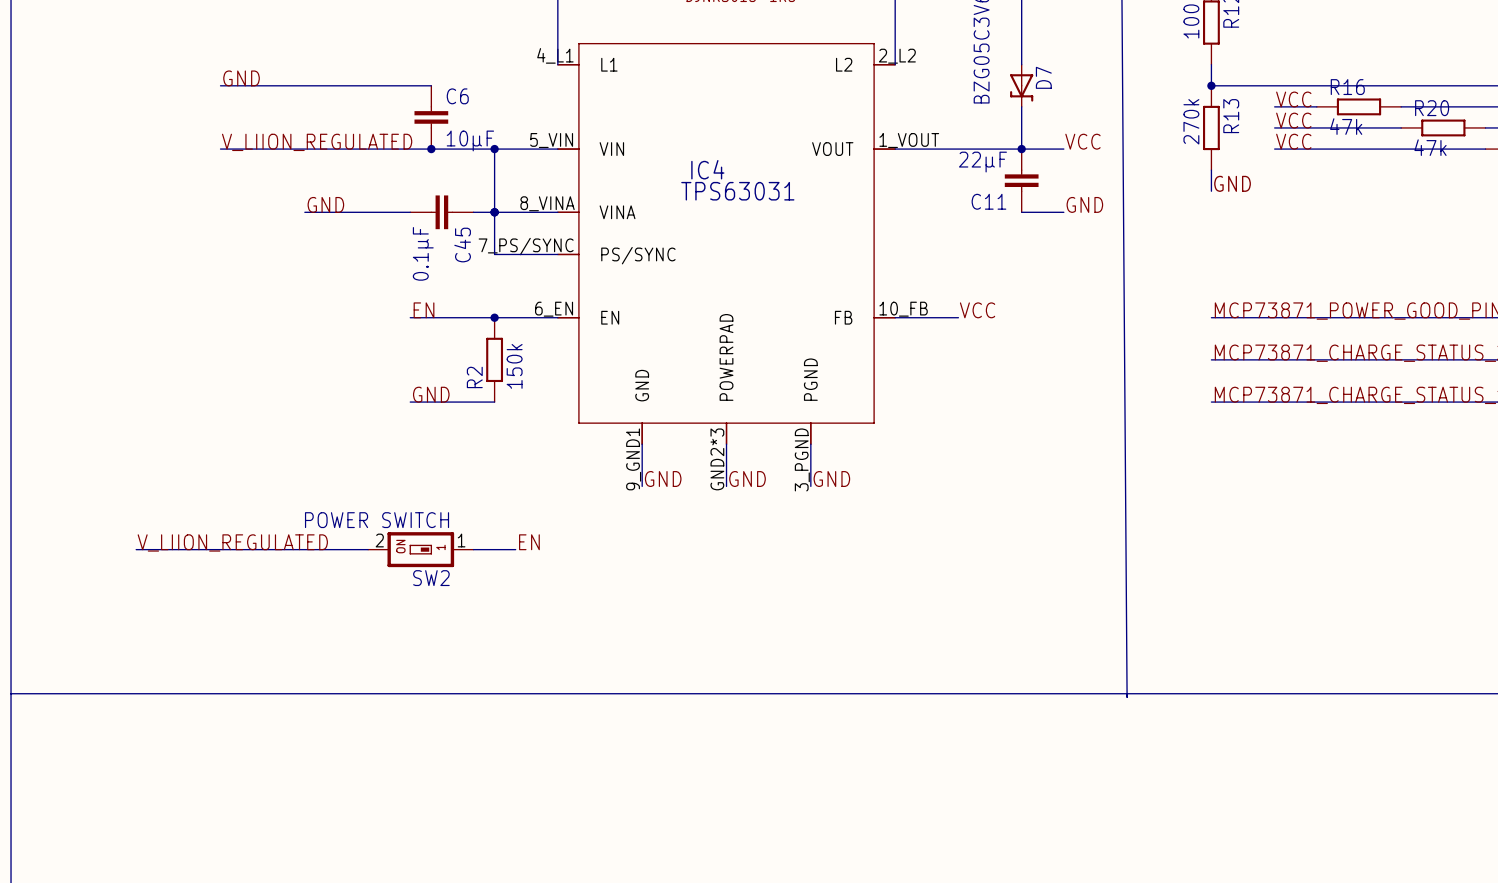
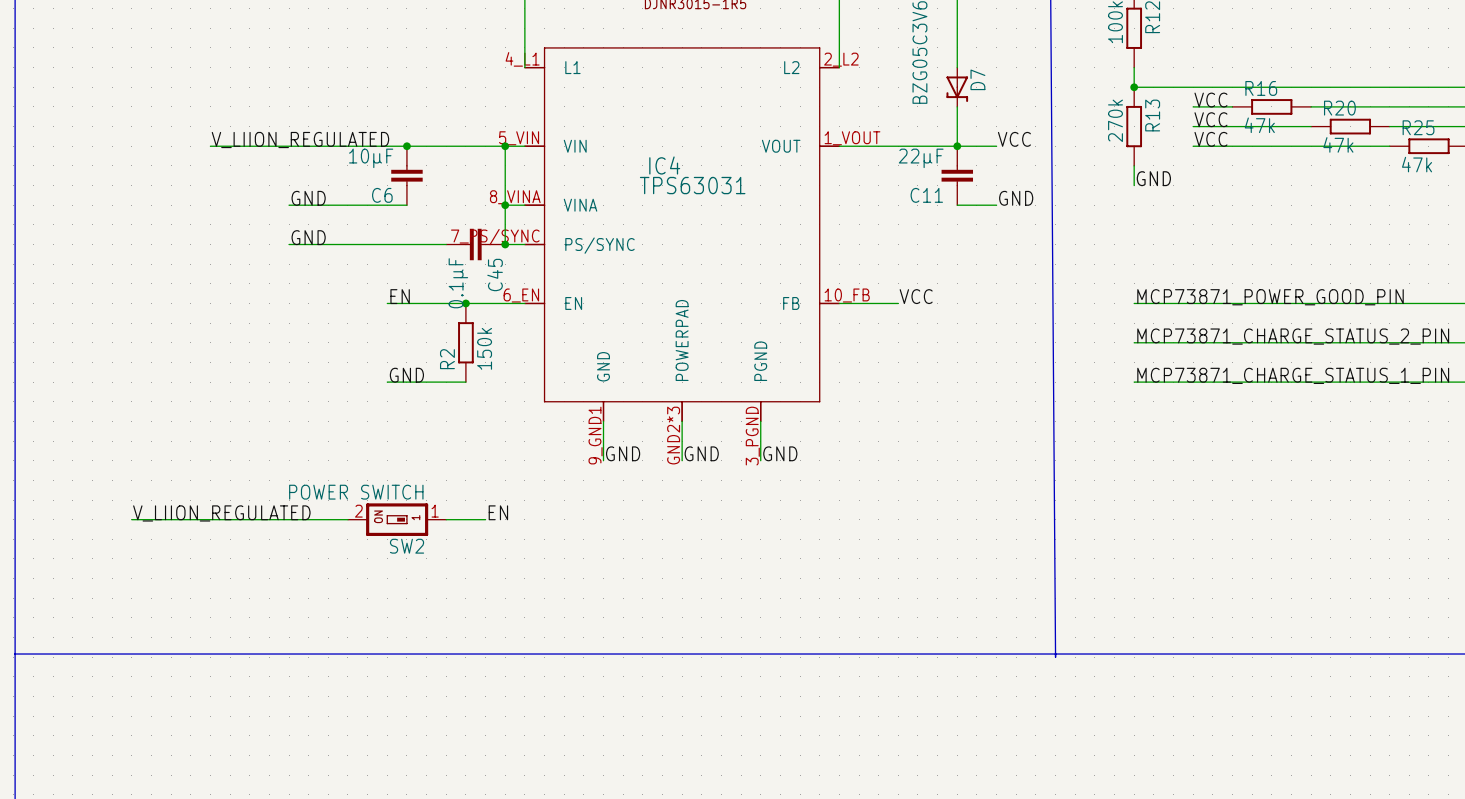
label position: GND (241, 78) -> GND (308, 237)
wire: (220, 85) (431, 85) -> none
C6 name position: C6 (457, 96) -> C6 (382, 195)
C6 position: (431, 117) -> (406, 175)
C6 value position: 10µF (470, 140) -> 10µF (371, 158)
wire: (494, 149) (494, 254) (536, 254) -> (505, 146) (505, 244)
junction: (494, 149) -> none
junction: none -> (505, 146)
C45 position: (441, 212) -> (475, 244)
wire: (473, 212) (536, 212) -> none
junction: (494, 212) -> none
junction: none -> (505, 205)
wire: none -> (289, 244) (446, 244)
junction: none -> (505, 244)

